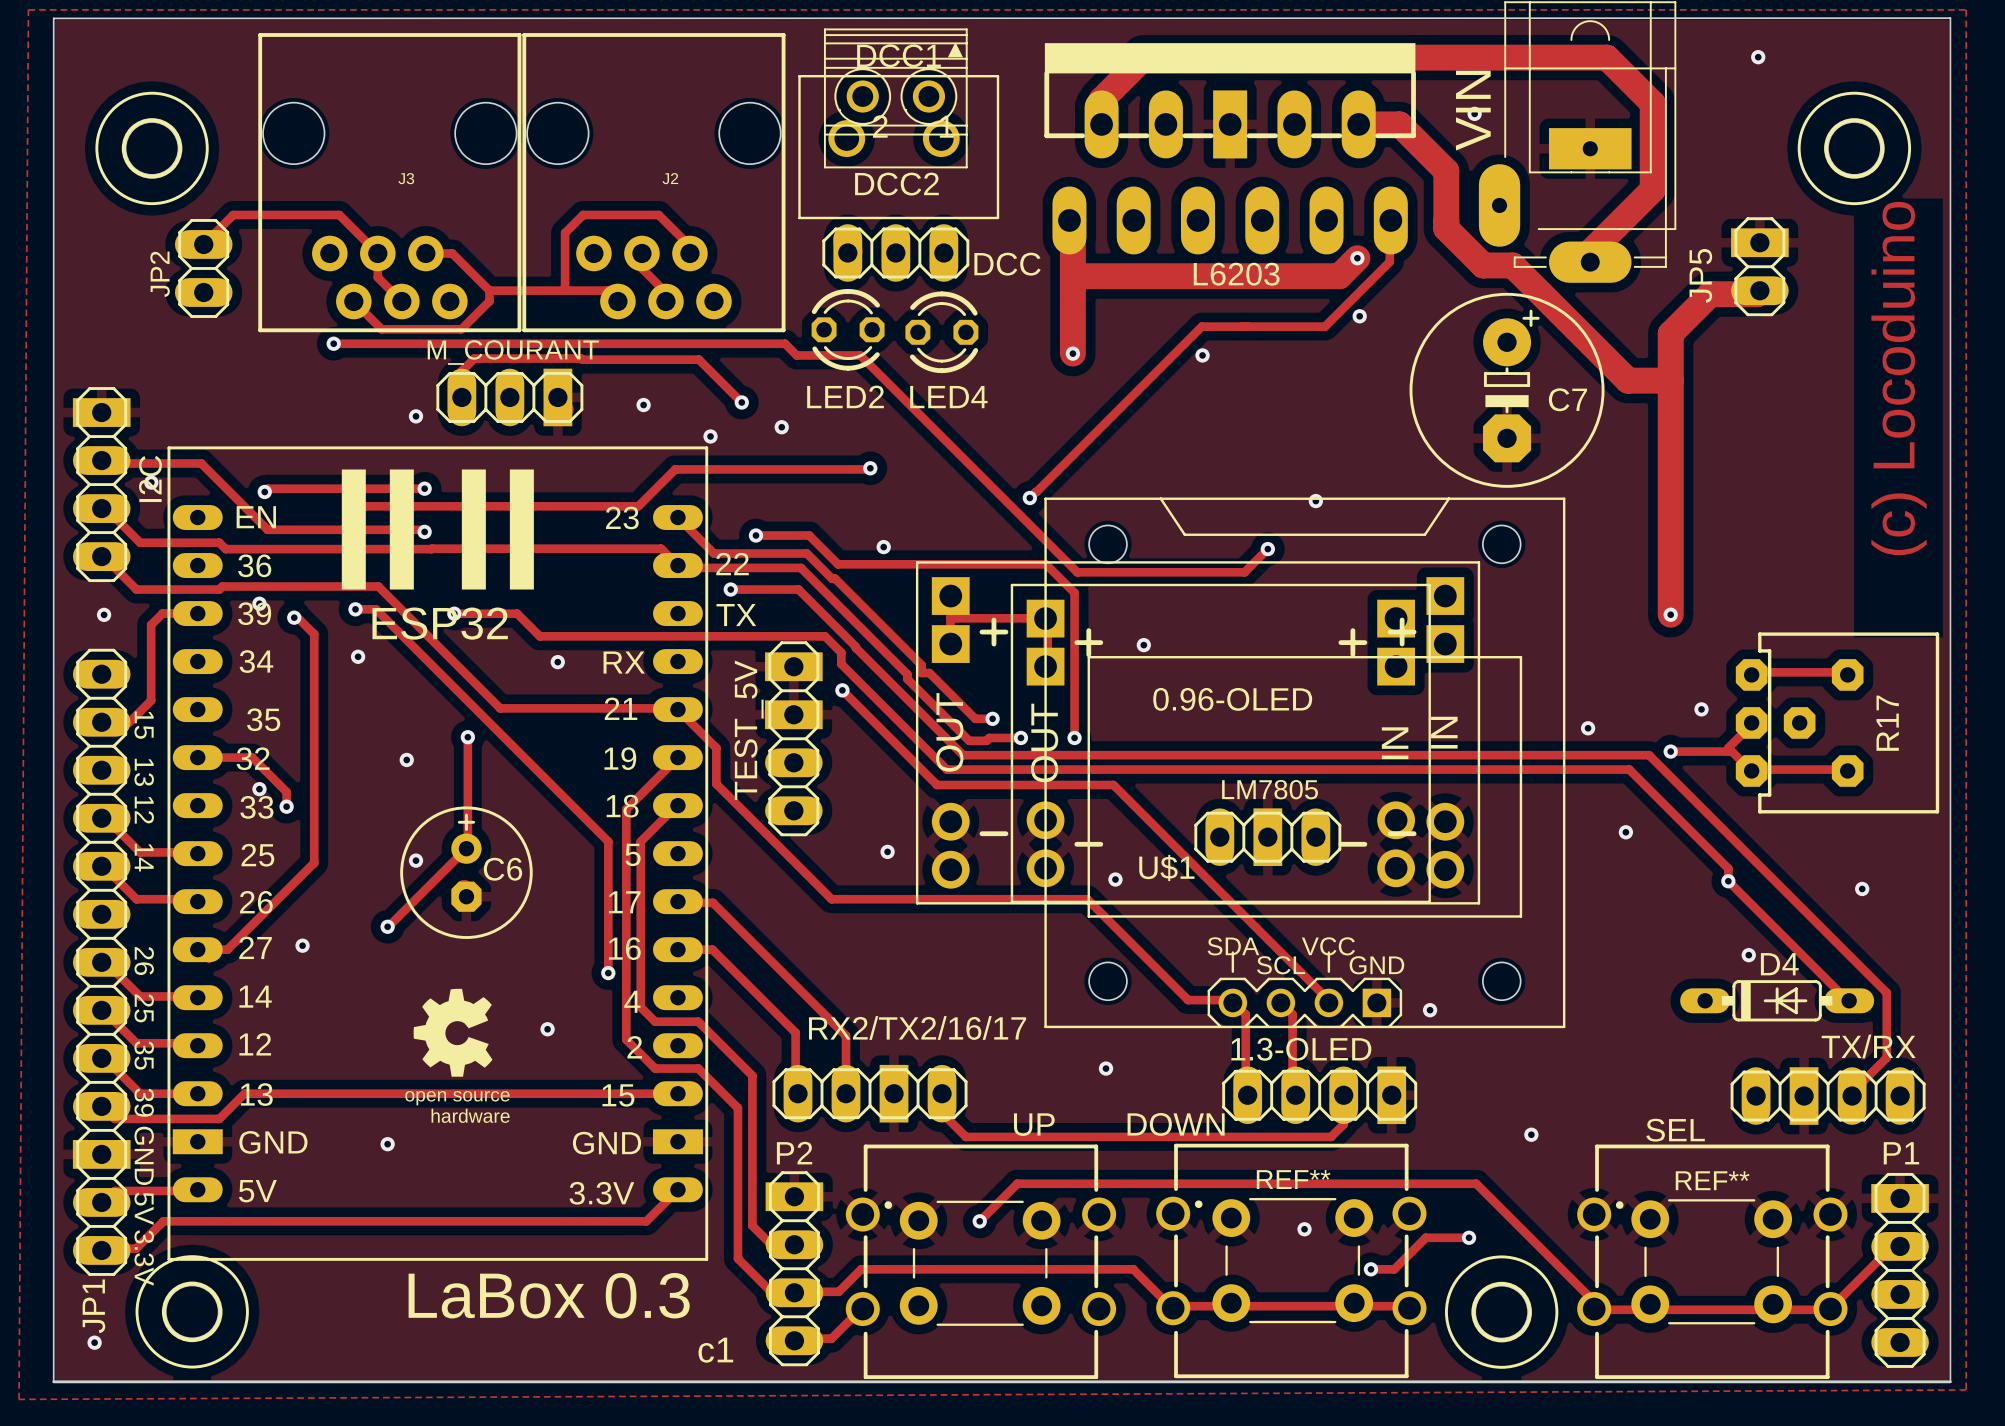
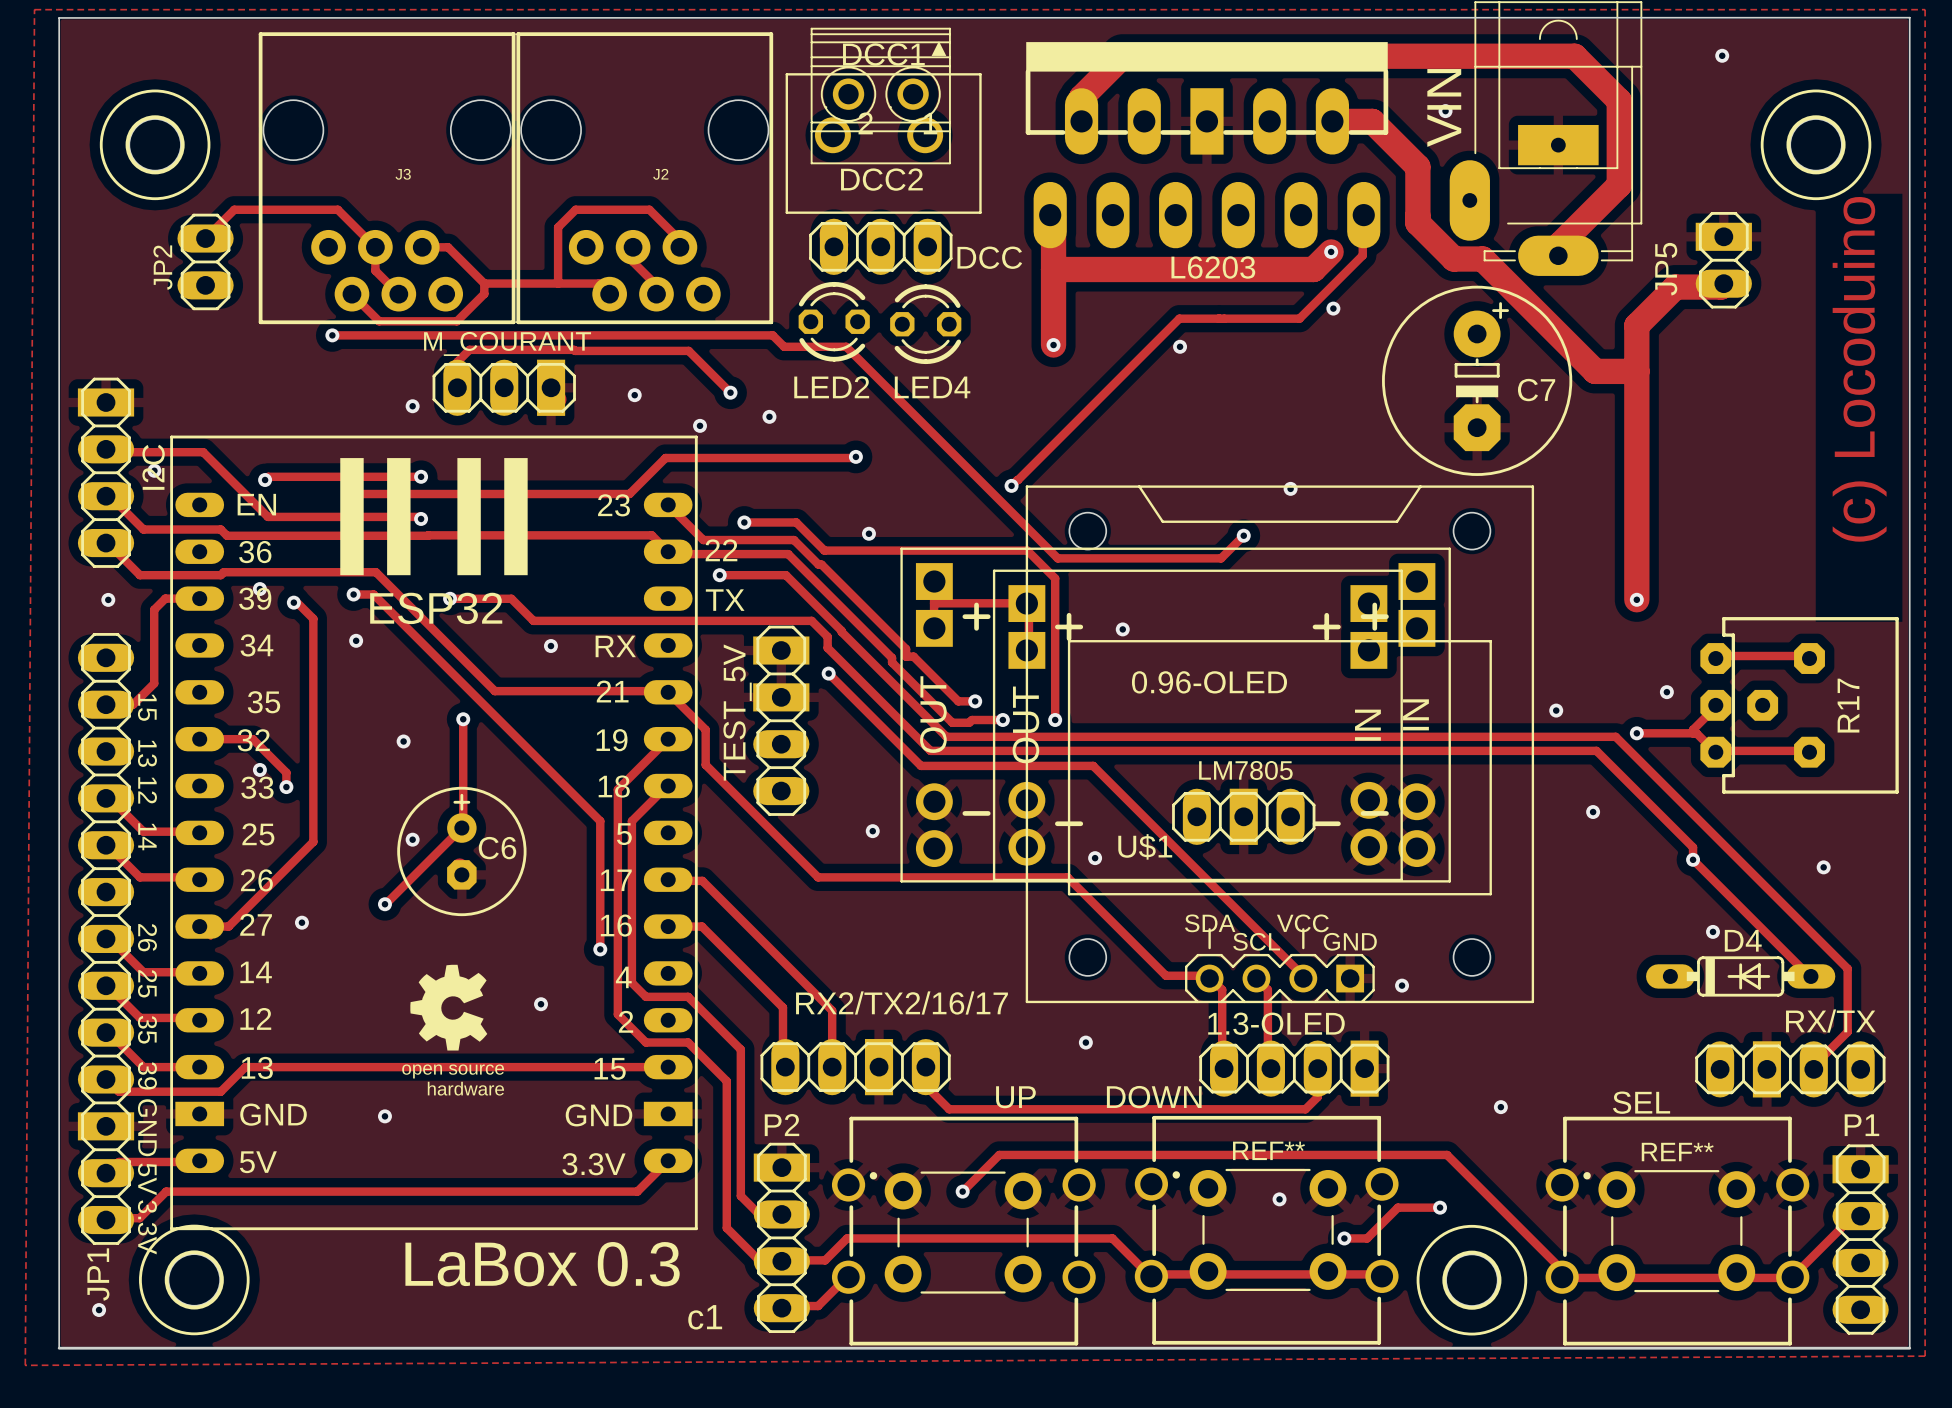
TX/RX name: TX/RX (1868, 1046) -> RX/TX (1830, 1021)

